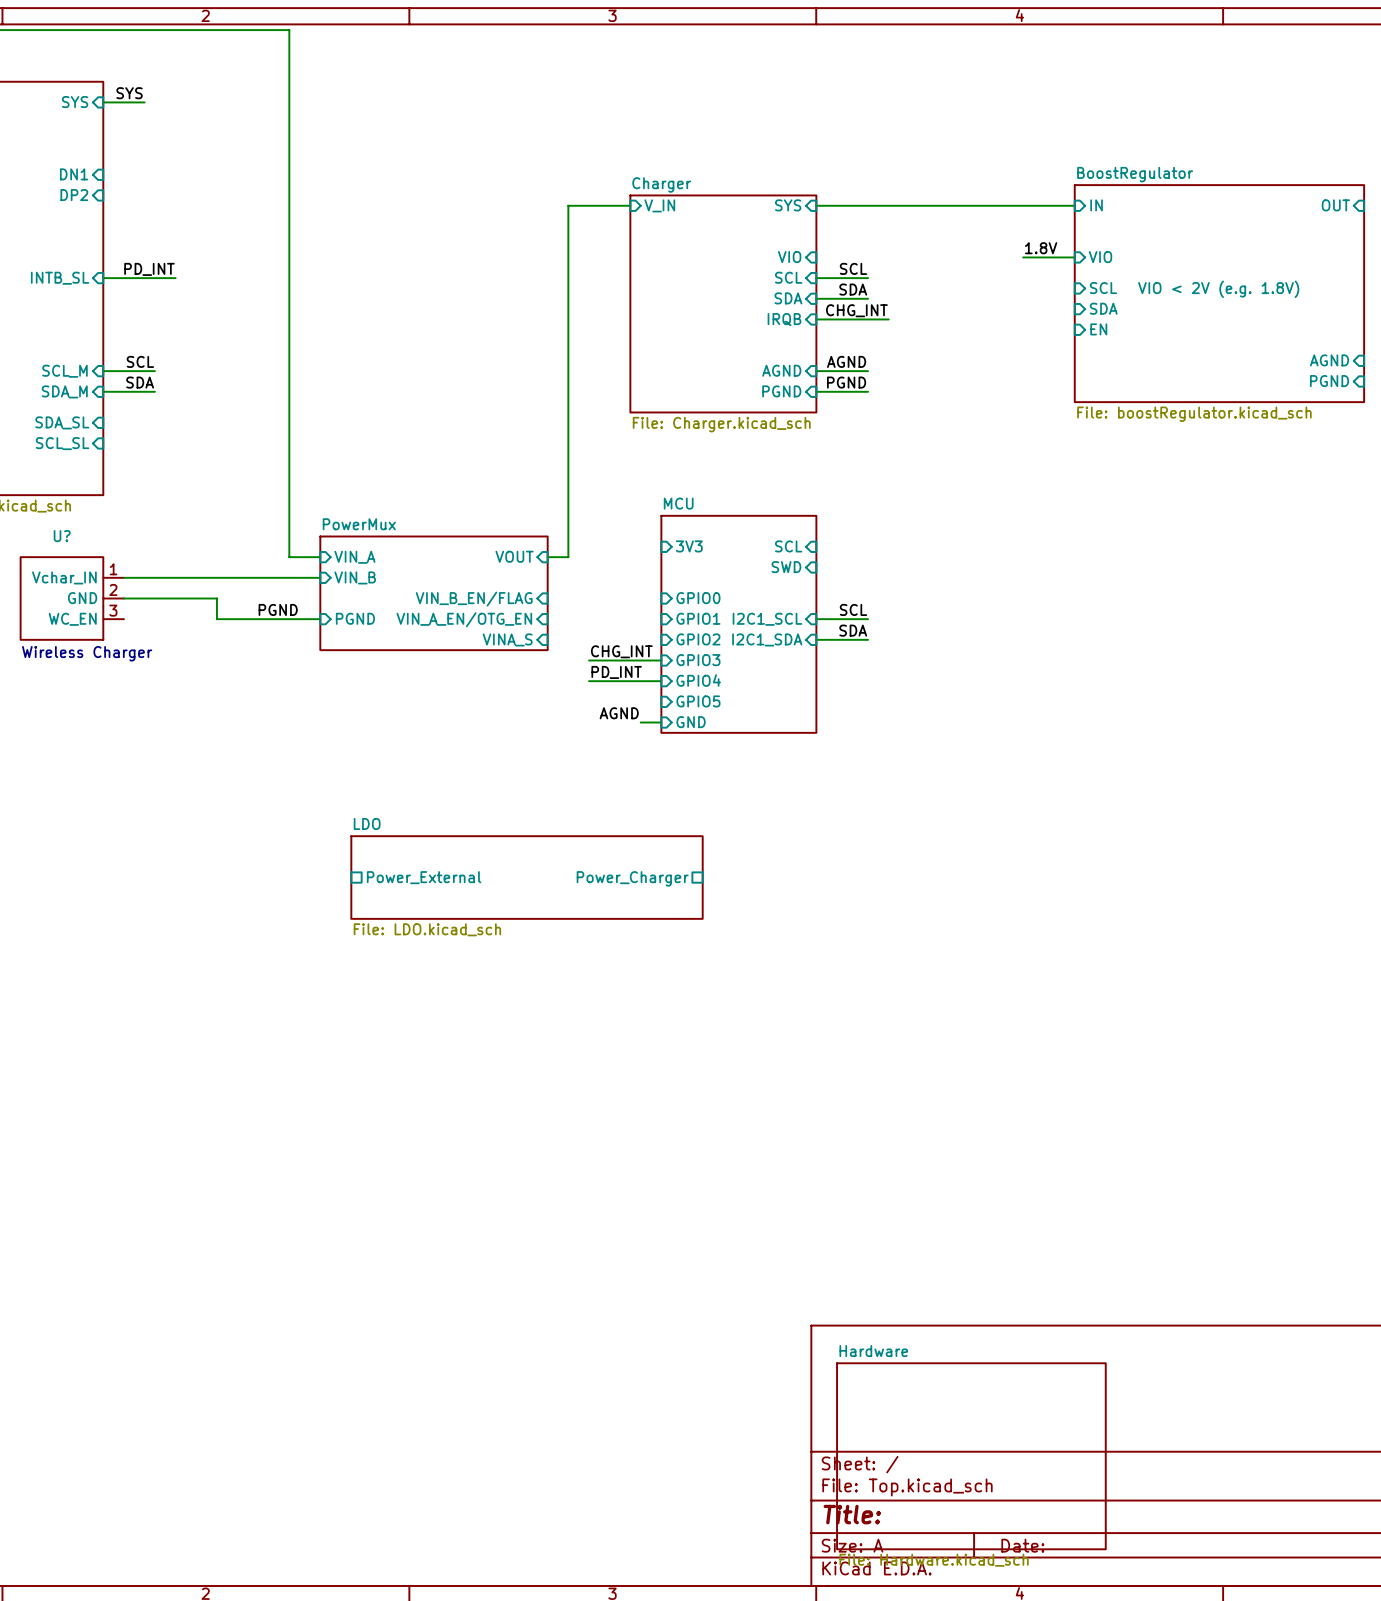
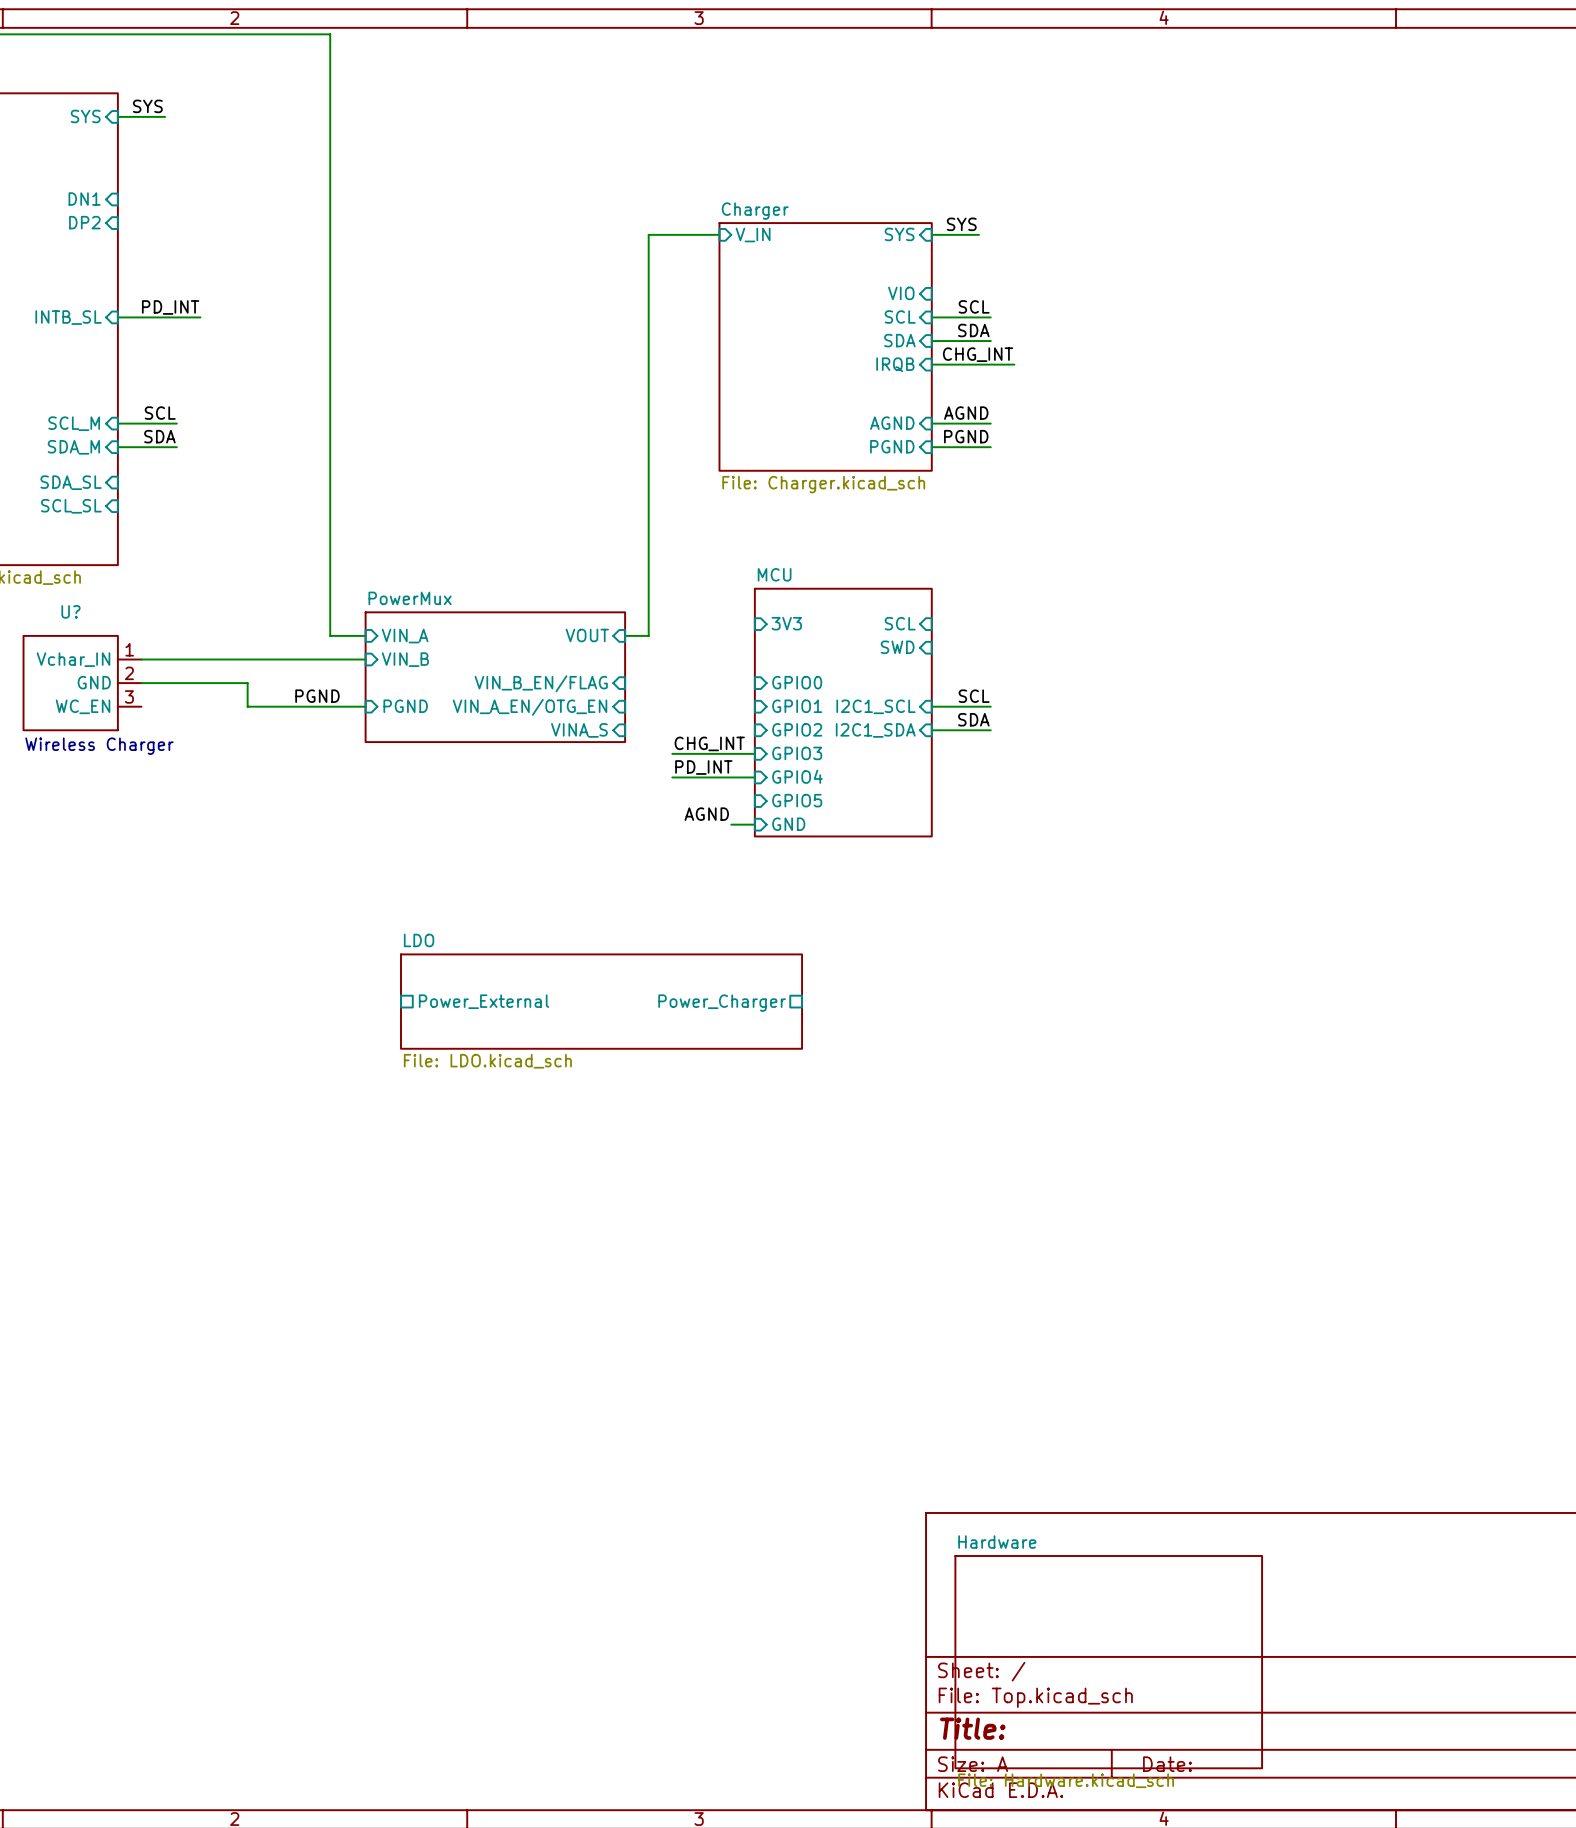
label: none -> SYS (961, 224)
wire: (857, 205) (1074, 205) -> none
sheet pin: IN (1096, 205) -> none
sheet pin: OUT (1335, 205) -> none
label: 1.8V (1041, 248) -> none
wire: (1023, 257) (1074, 257) -> none
sheet pin: VIO (1100, 257) -> none
sheet pin: SCL (1103, 288) -> none
sheet BoostRegulator: File: boostRegulator.kicad_sch (1219, 293) -> none
sheet pin: SDA (1103, 308) -> none
sheet pin: EN (1098, 329) -> none
sheet pin: AGND (1329, 360) -> none
sheet pin: PGND (1329, 381) -> none

